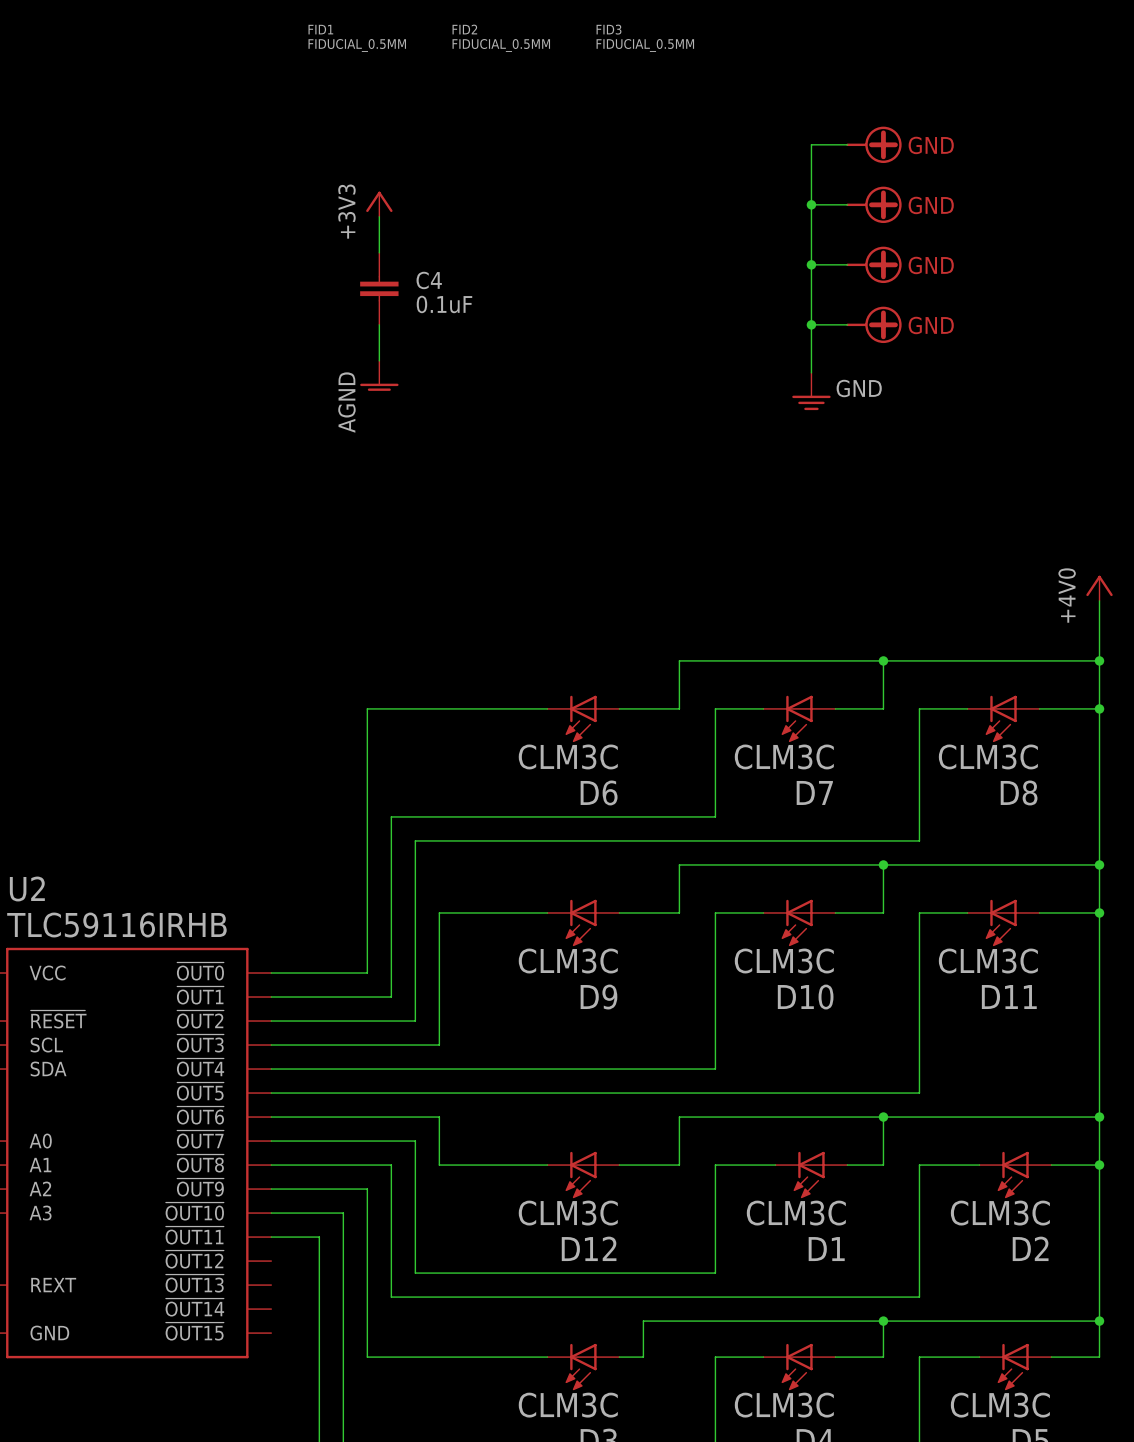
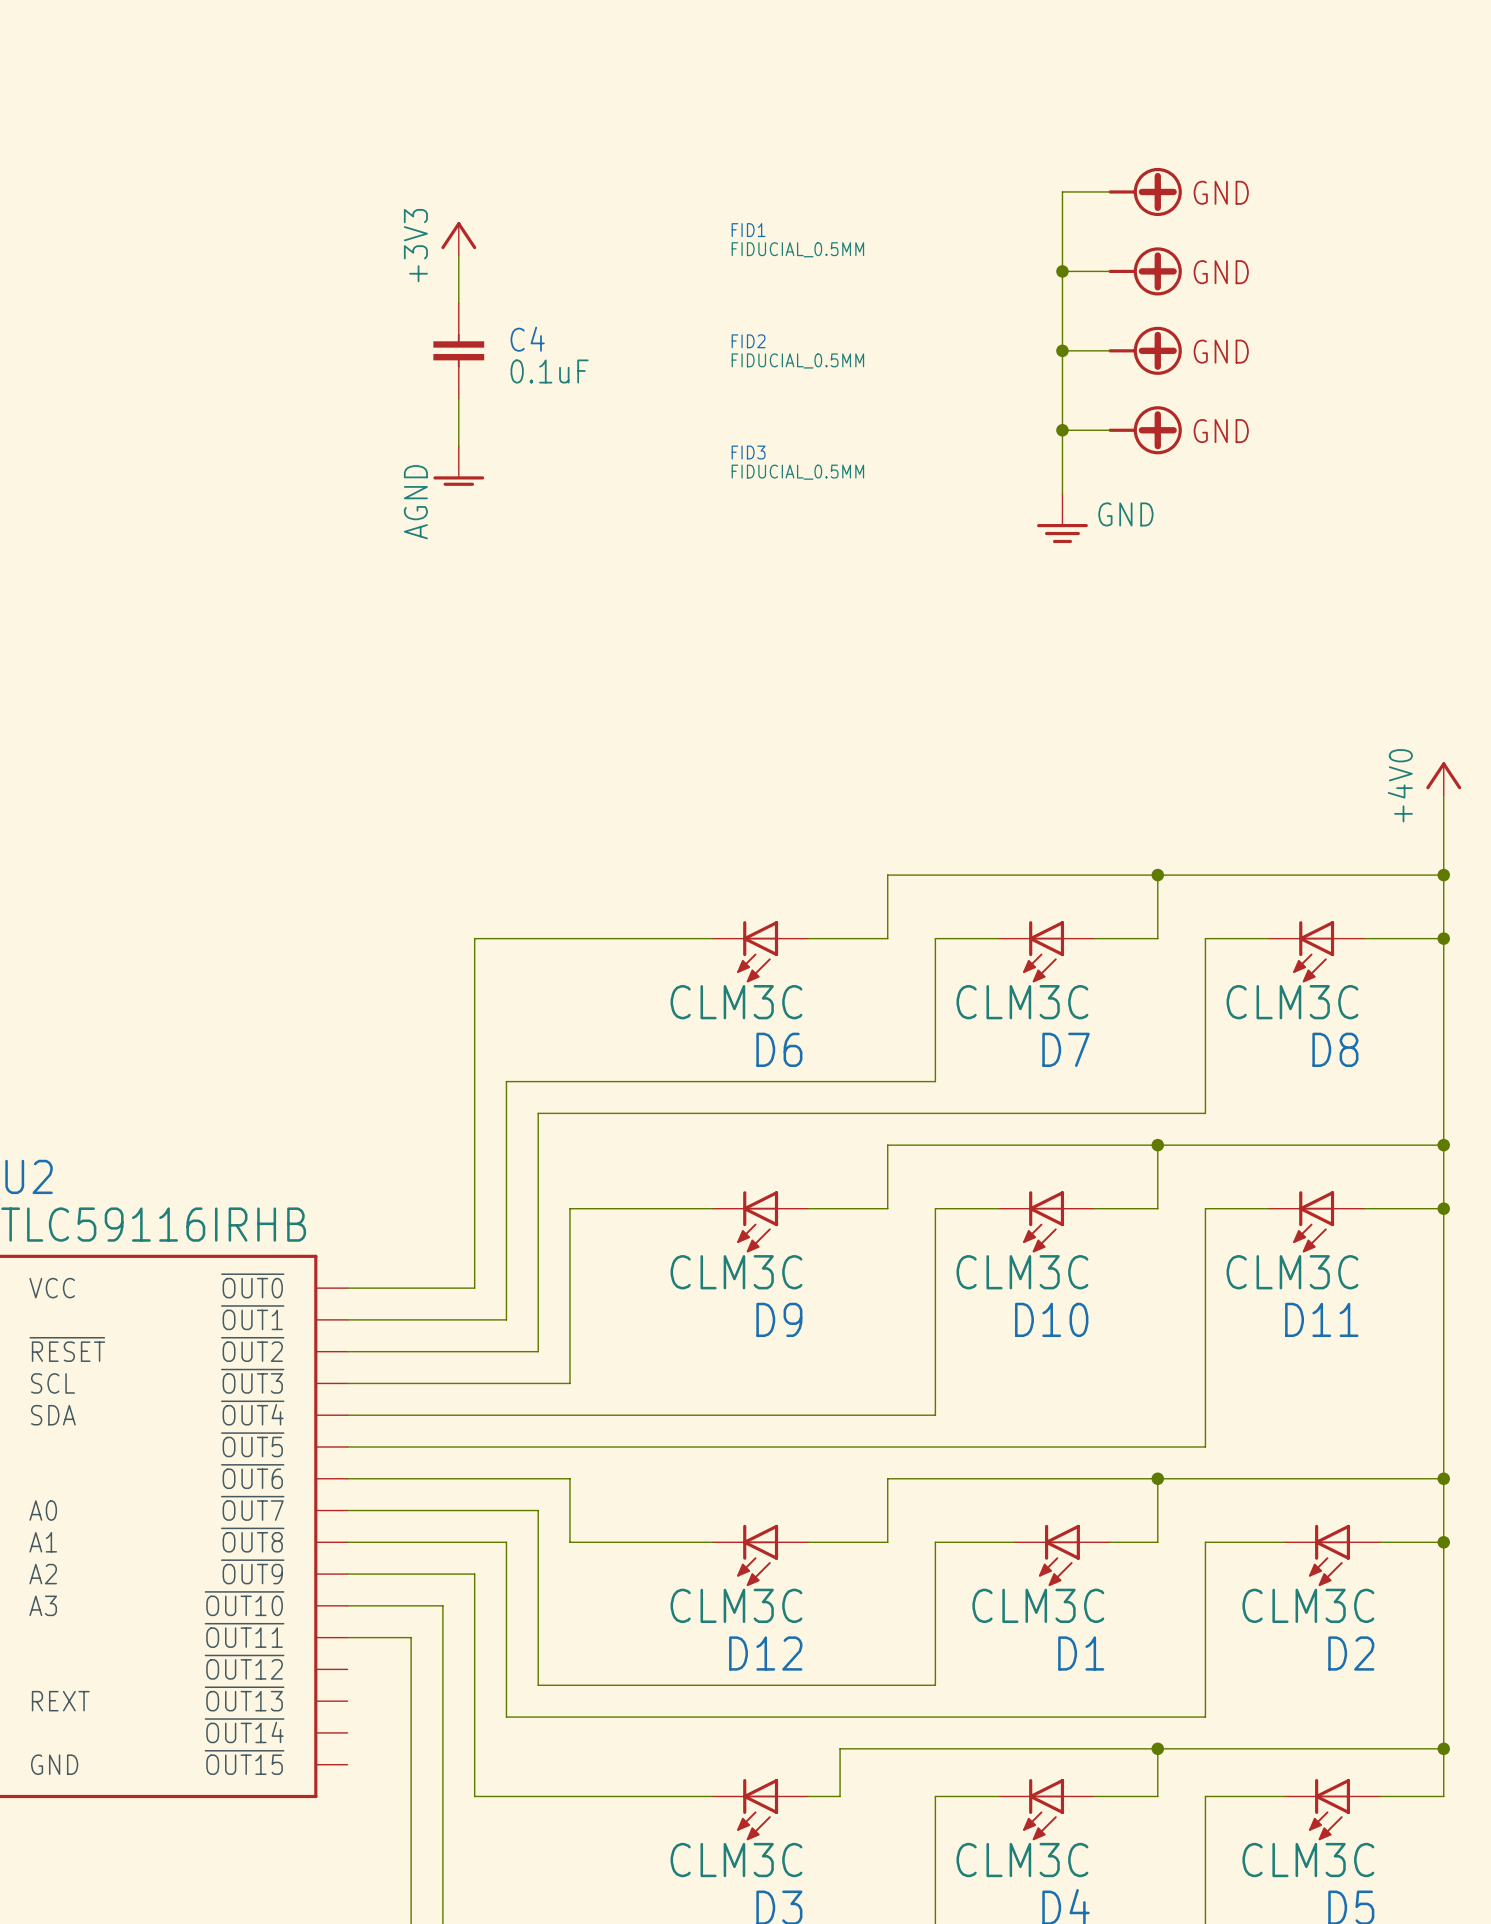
FID1 position: (357, 38) -> (797, 240)
FID2 position: (501, 38) -> (797, 351)
FID3 position: (645, 38) -> (797, 462)
power symbol position: +3V3 (379, 204) -> +3V3 (458, 238)
wire: (379, 216) (379, 252) -> (458, 255) (458, 303)
C4 position: (379, 288) -> (458, 350)
wire: (379, 324) (379, 360) -> (458, 398) (458, 446)
power symbol position: AGND (379, 375) -> AGND (458, 466)

